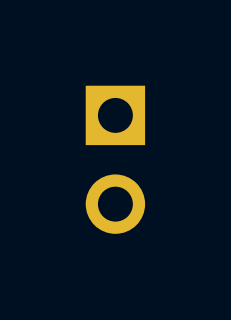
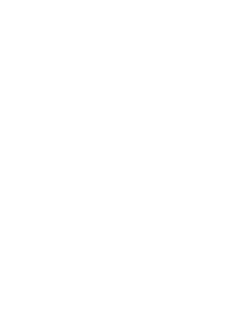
part: (115, 159) -> none

